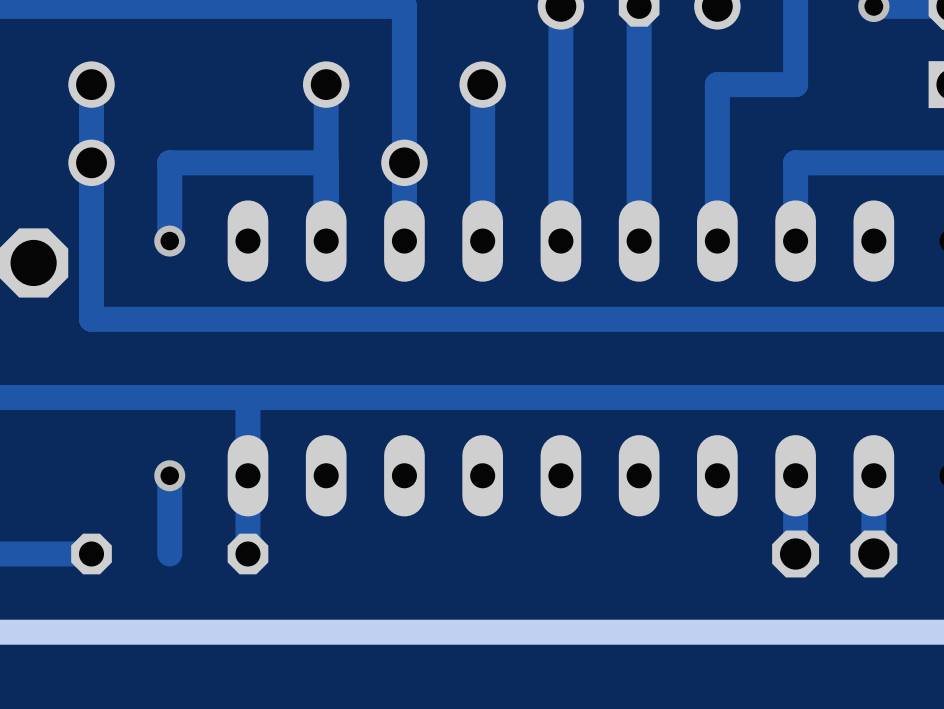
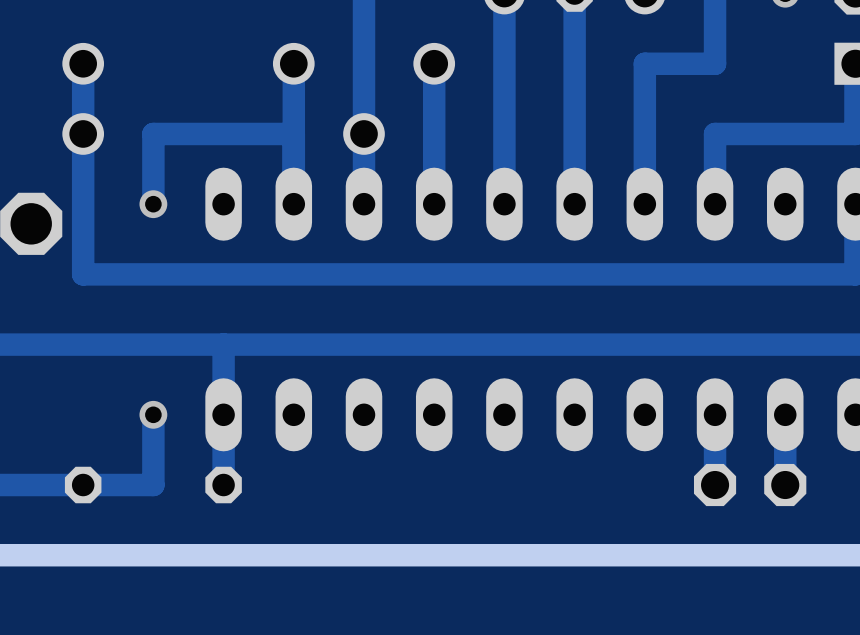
track: none -> (153, 485) (83, 485)

